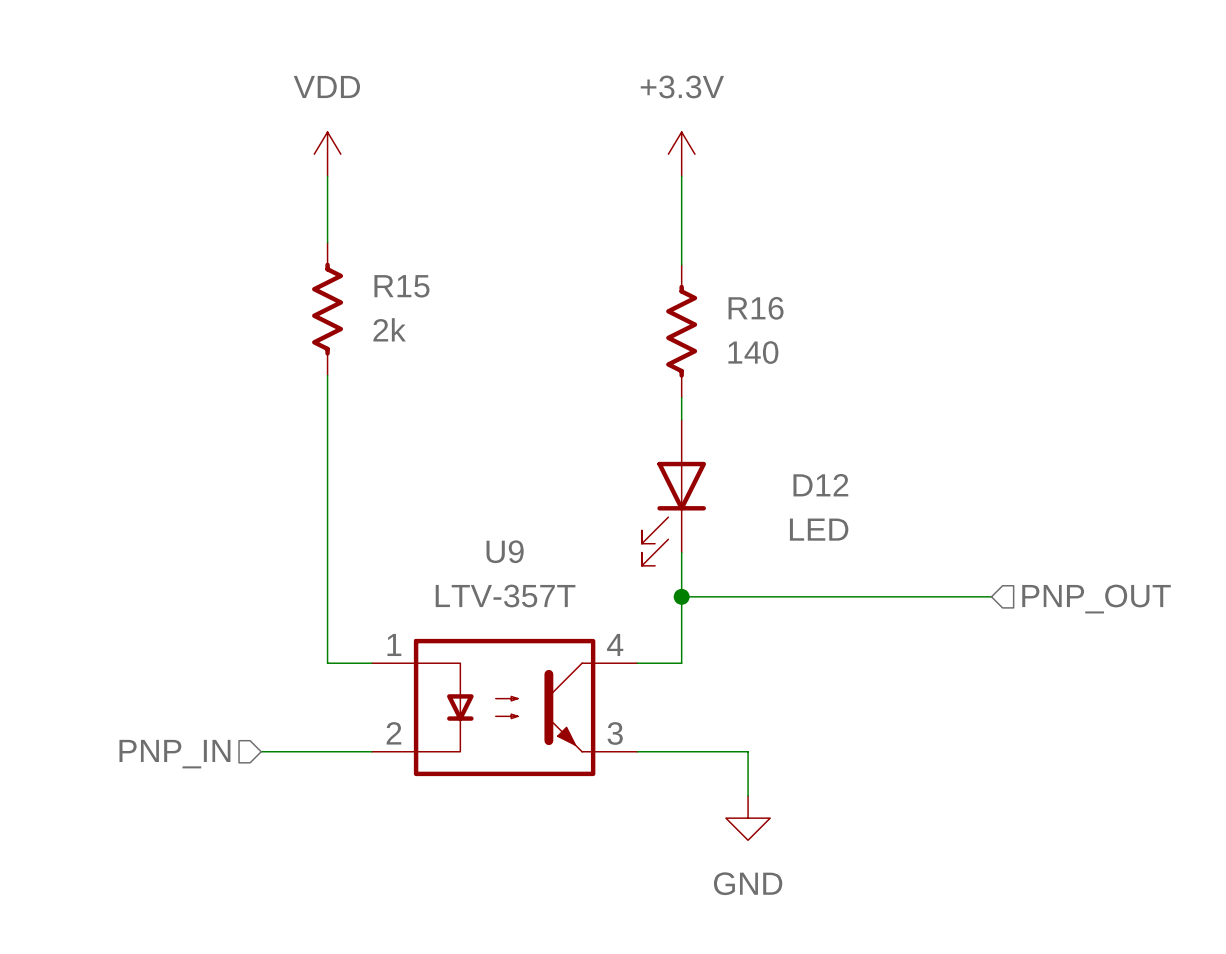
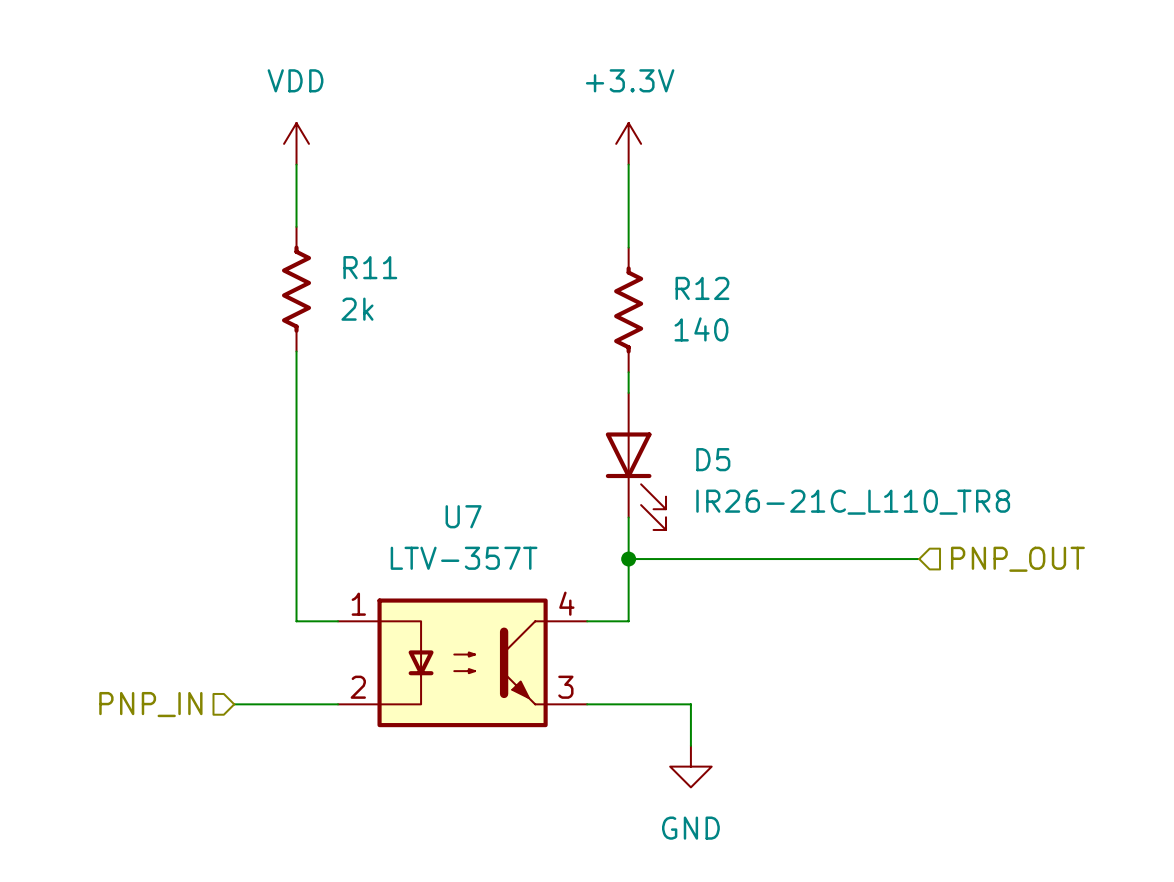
R15 name: R15 (401, 286) -> R11 (370, 267)
R16 name: R16 (756, 308) -> R12 (702, 288)
D12: LED (673, 492) -> none
D5: none -> IR26-21C_L110_TR8 (635, 461)
U9 name: U9 (505, 551) -> U7 (463, 516)

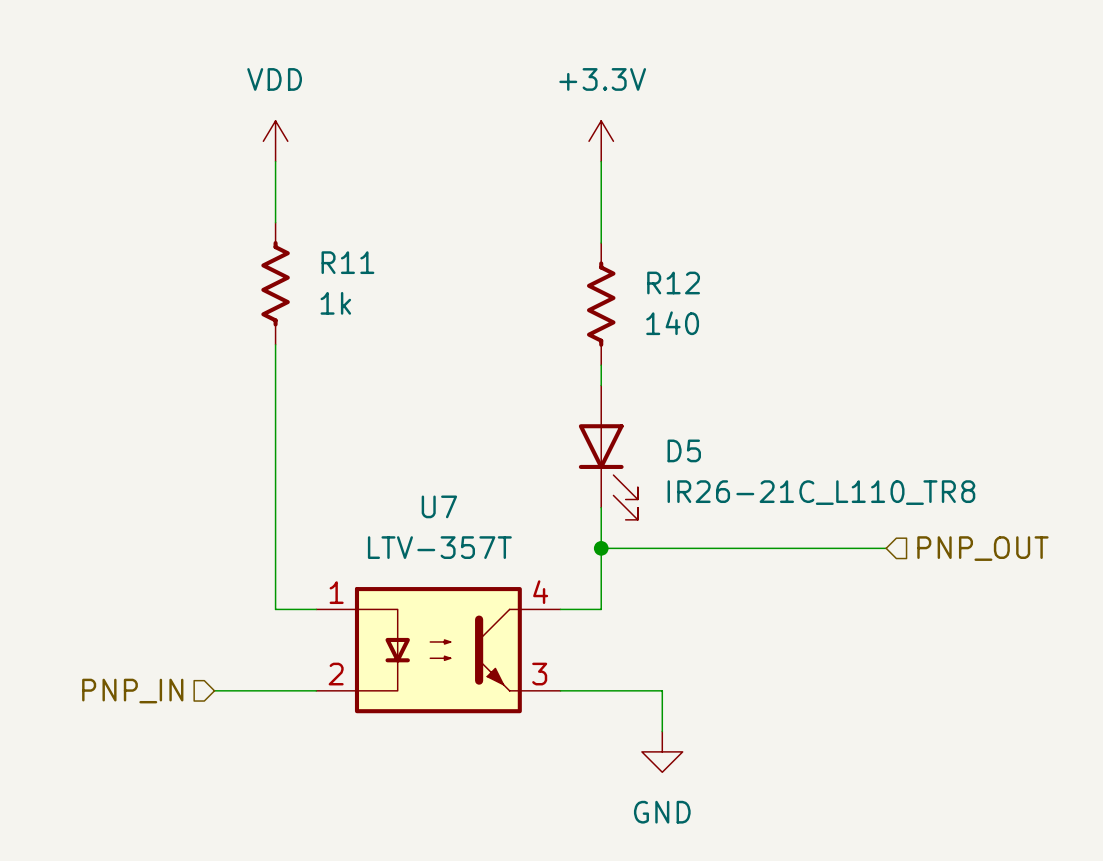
R11 value: 2k (357, 309) -> 1k (335, 303)

